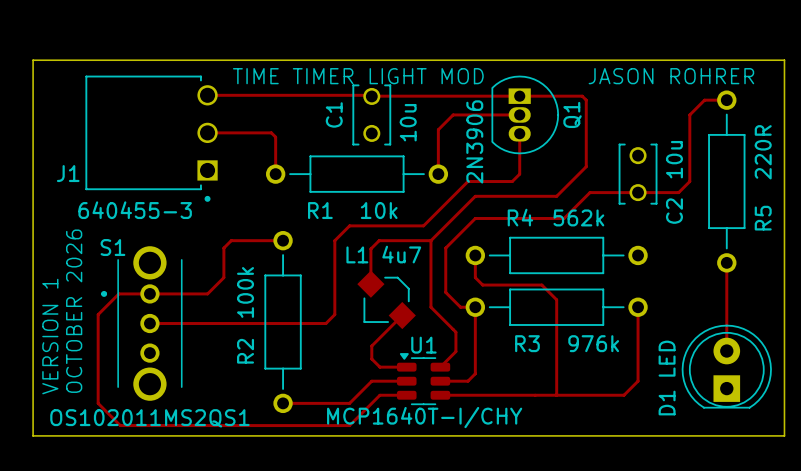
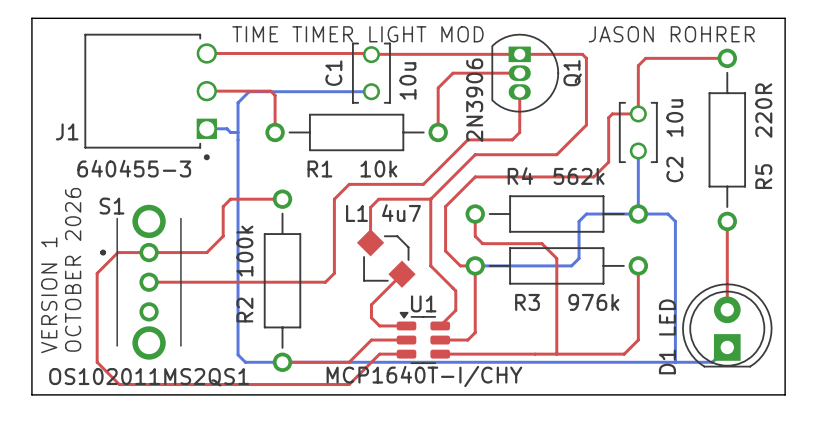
top track: (704, 100) (689, 114) (689, 181) (678, 192) (589, 192) (564, 218) -> (705, 58) (645, 58) (638, 65) (638, 113) (612, 113) (608, 117) (608, 162) (593, 176) (564, 176)
bottom track: none -> (371, 91) (249, 91) (238, 102) (238, 354) (245, 362) (712, 362) (727, 347)
bottom track: none -> (206, 128) (226, 128) (230, 132) (238, 132)
bottom track: none -> (638, 151) (638, 214)
bottom track: none -> (475, 265) (571, 265) (579, 258) (579, 221) (586, 214) (667, 214) (675, 221) (675, 362)

